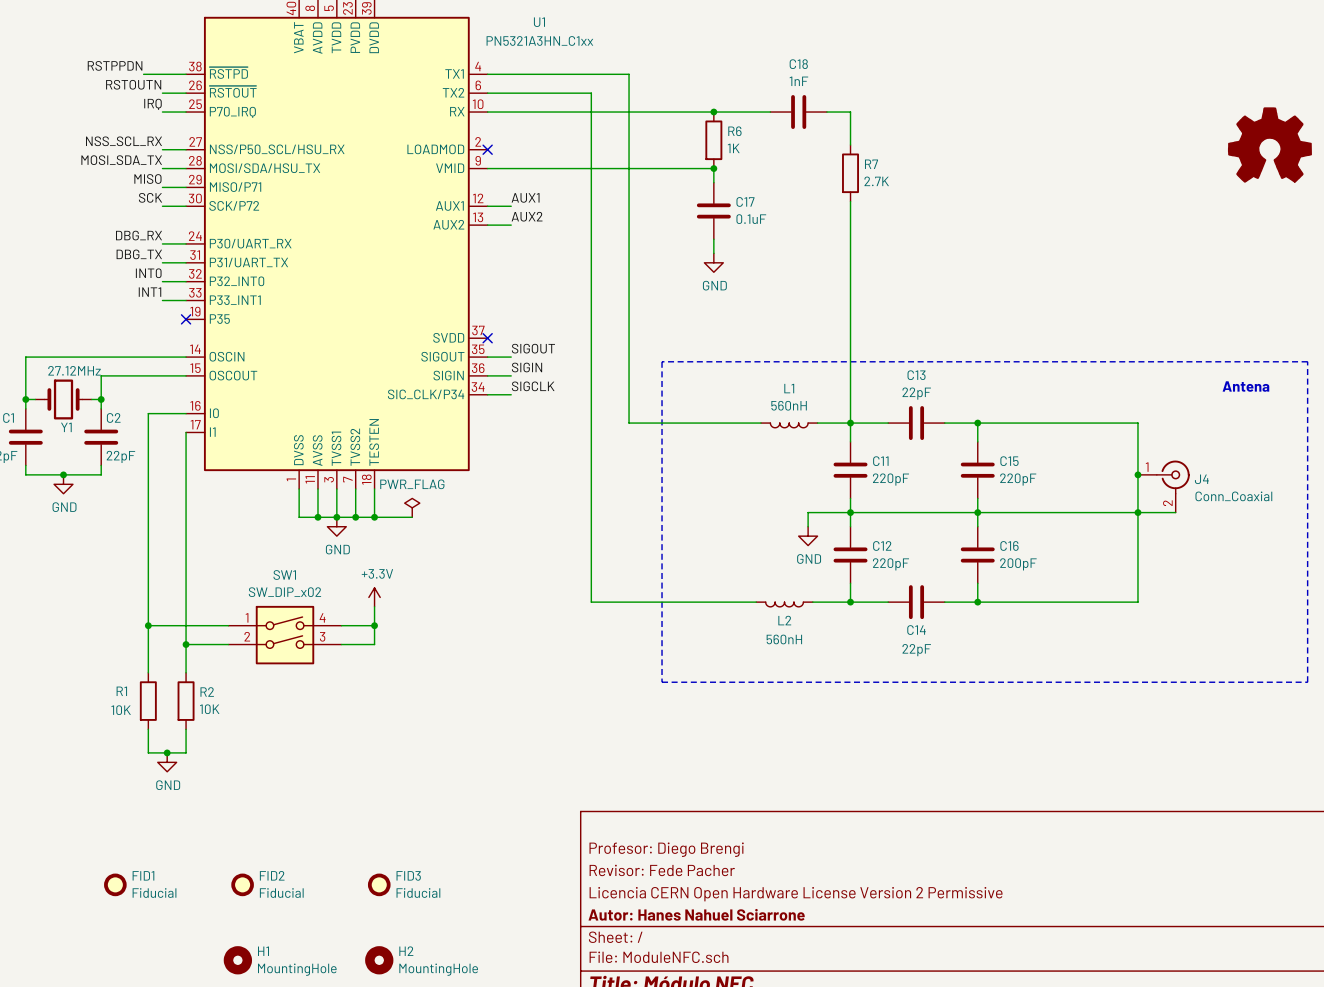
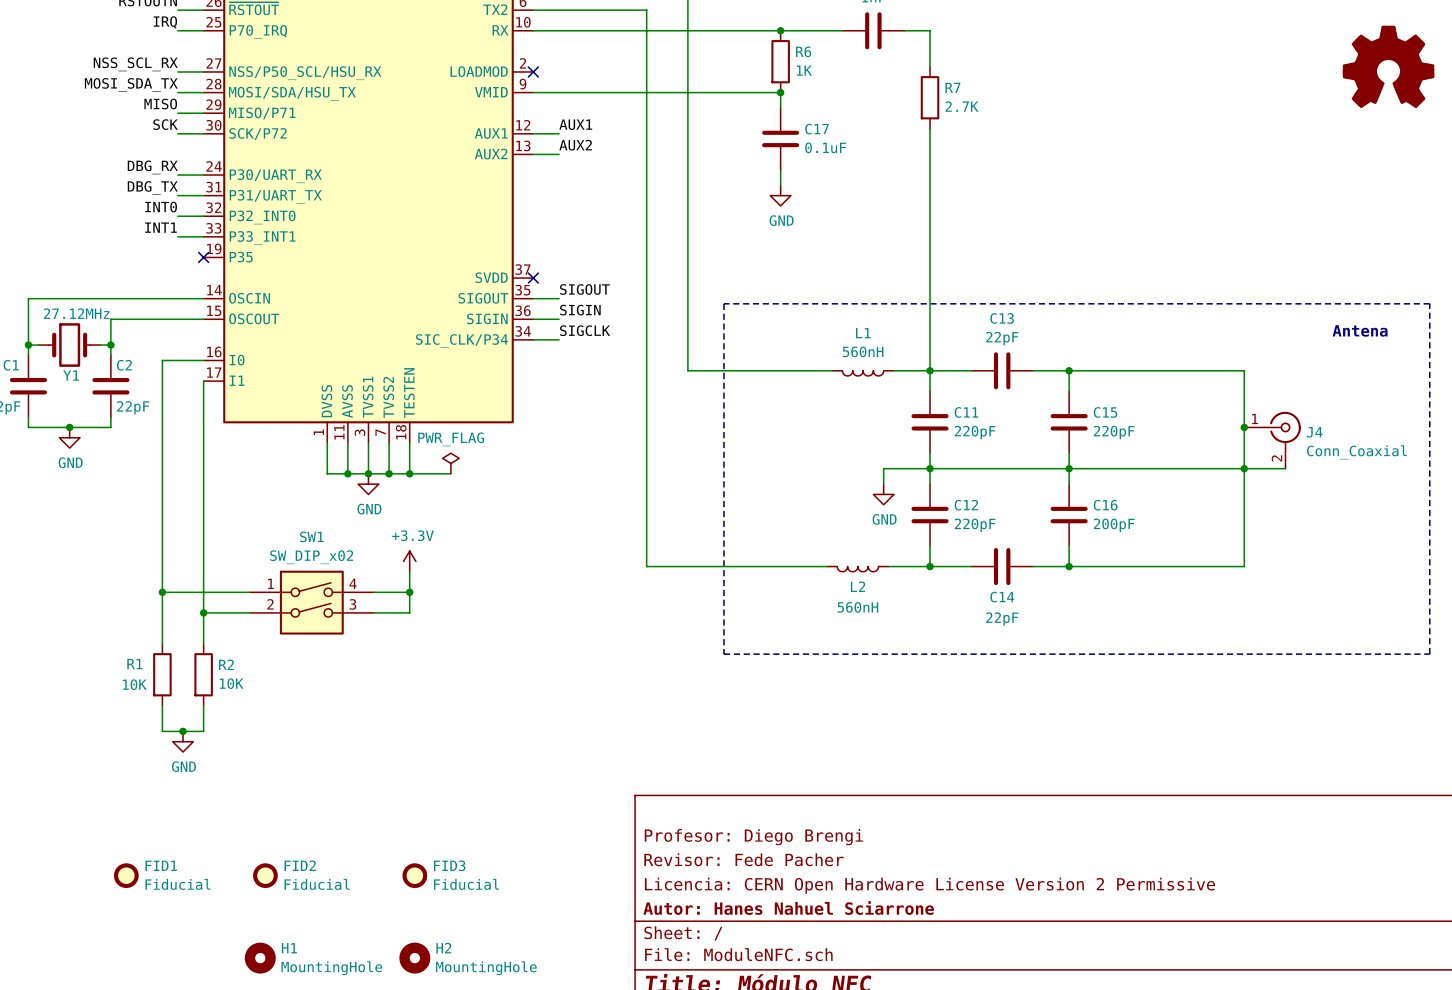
title block: Licencia CERN Open Hardware License Version 2 Permissive (796, 894) -> Licencia: CERN Open Hardware License Version 2 Permissive (929, 885)

